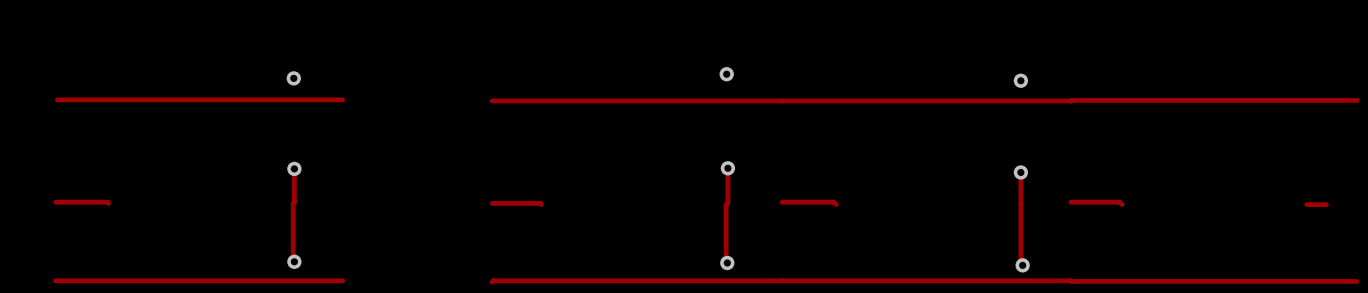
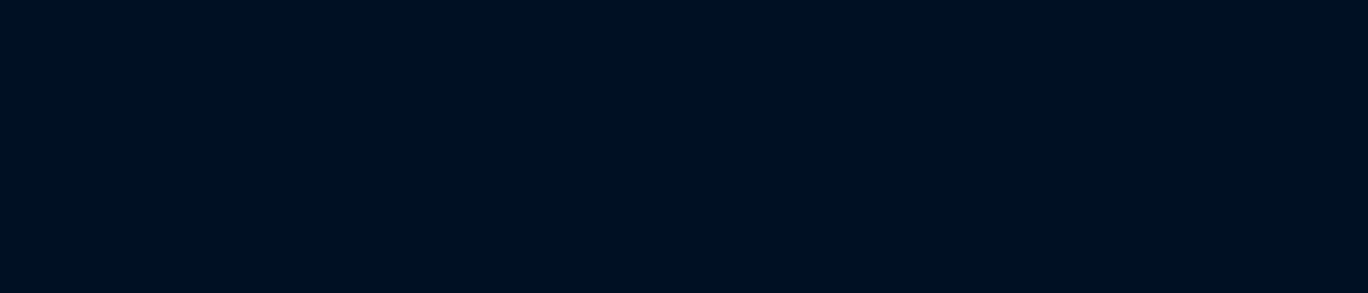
via: (726, 74) -> none
via: (293, 78) -> none
via: (1020, 80) -> none
track: (57, 99) (342, 99) -> none
track: (1357, 100) (492, 101) -> none
track: (294, 168) (294, 261) -> none
via: (294, 168) -> none
track: (727, 168) (727, 202) (726, 204) (727, 262) -> none
via: (727, 168) -> none
track: (1020, 172) (1020, 263) (1022, 265) -> none
via: (1020, 172) -> none
track: (55, 202) (108, 203) -> none
track: (782, 202) (833, 202) (836, 204) -> none
track: (1070, 202) (1119, 202) (1122, 204) -> none
track: (492, 203) (541, 204) -> none
track: (1306, 204) (1326, 204) -> none
via: (294, 261) -> none
via: (727, 262) -> none
via: (1022, 265) -> none
track: (55, 280) (342, 280) -> none
track: (1356, 281) (492, 282) -> none

